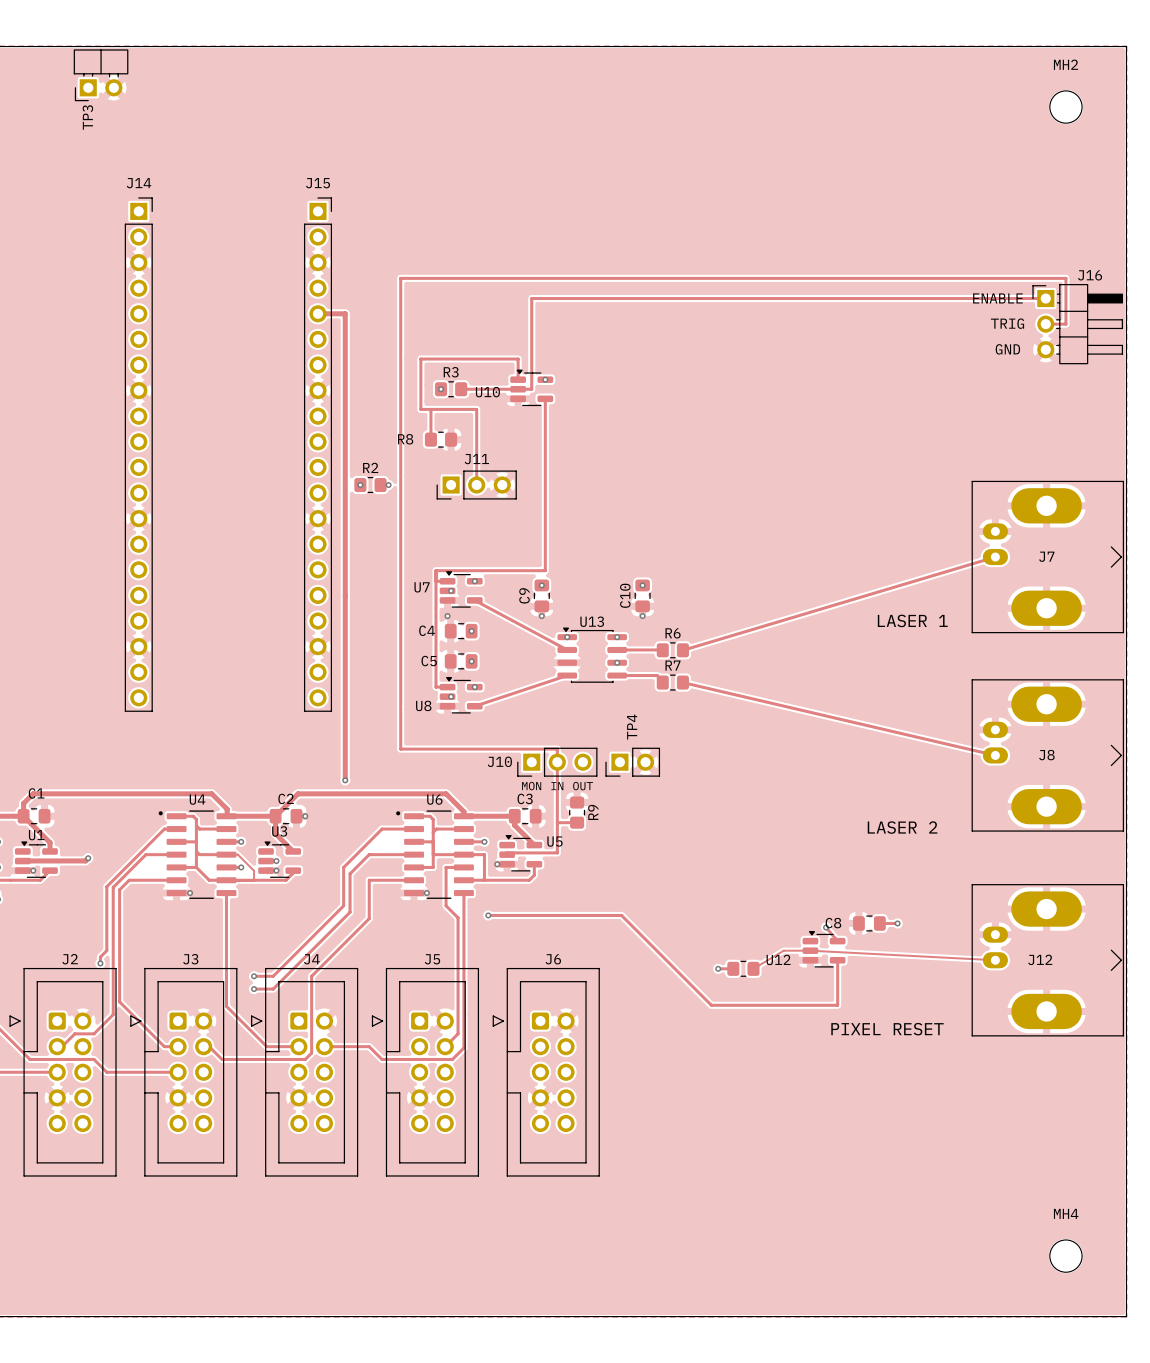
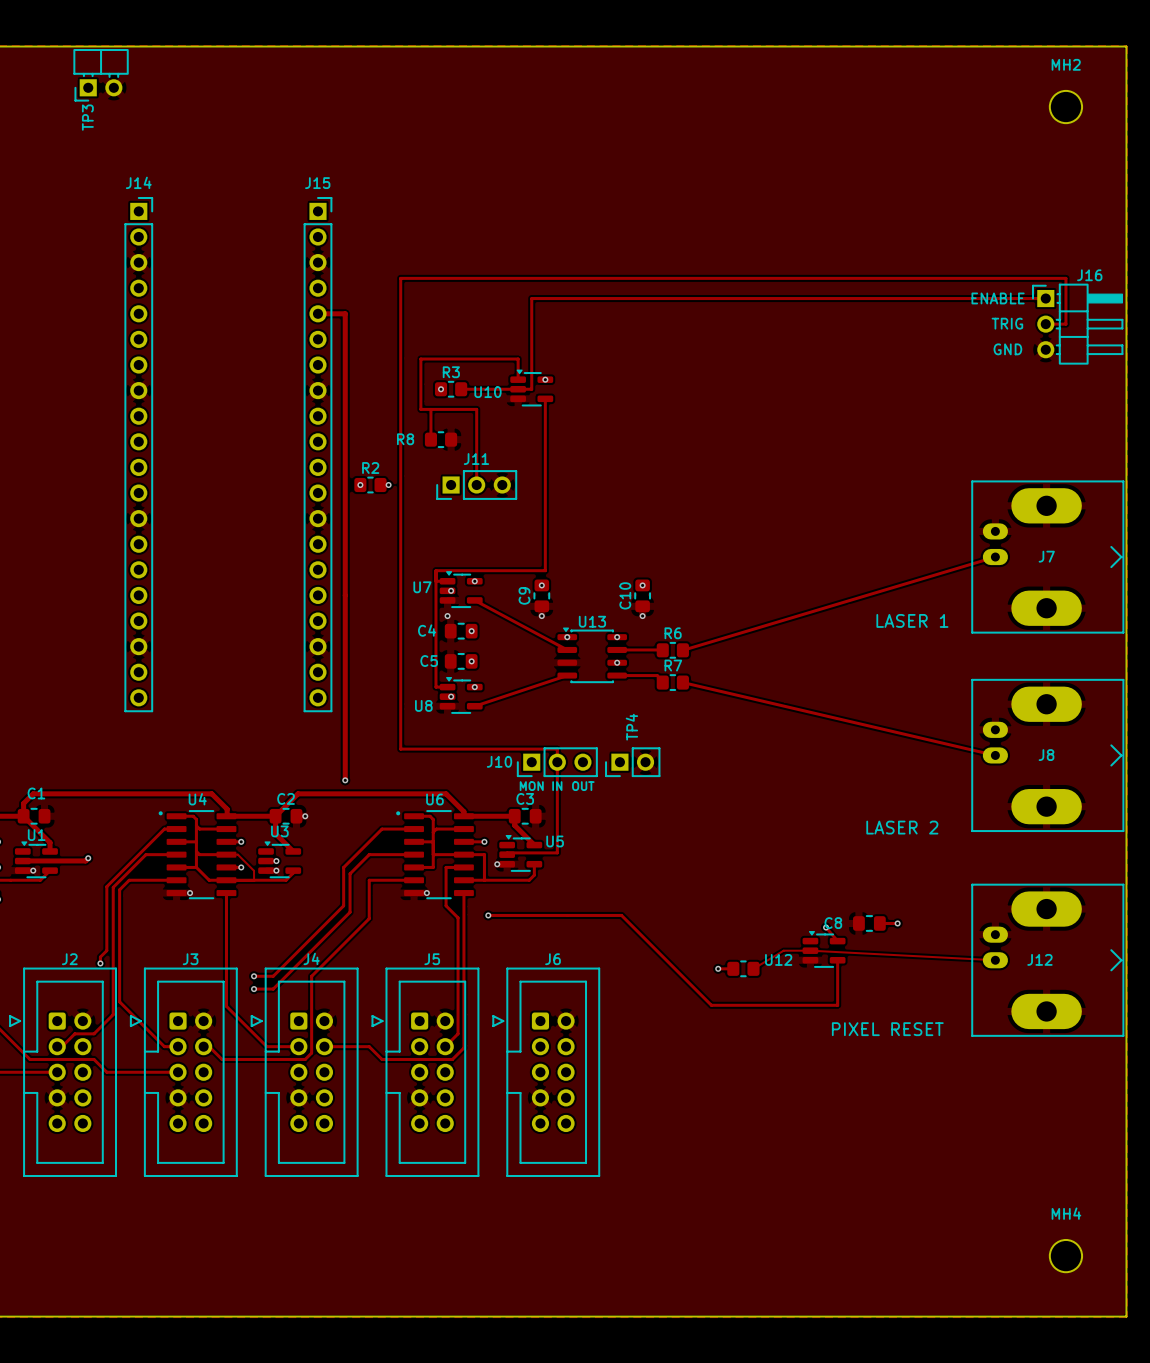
R9: (577, 812) -> none
track: (557, 822) (577, 822) -> none

